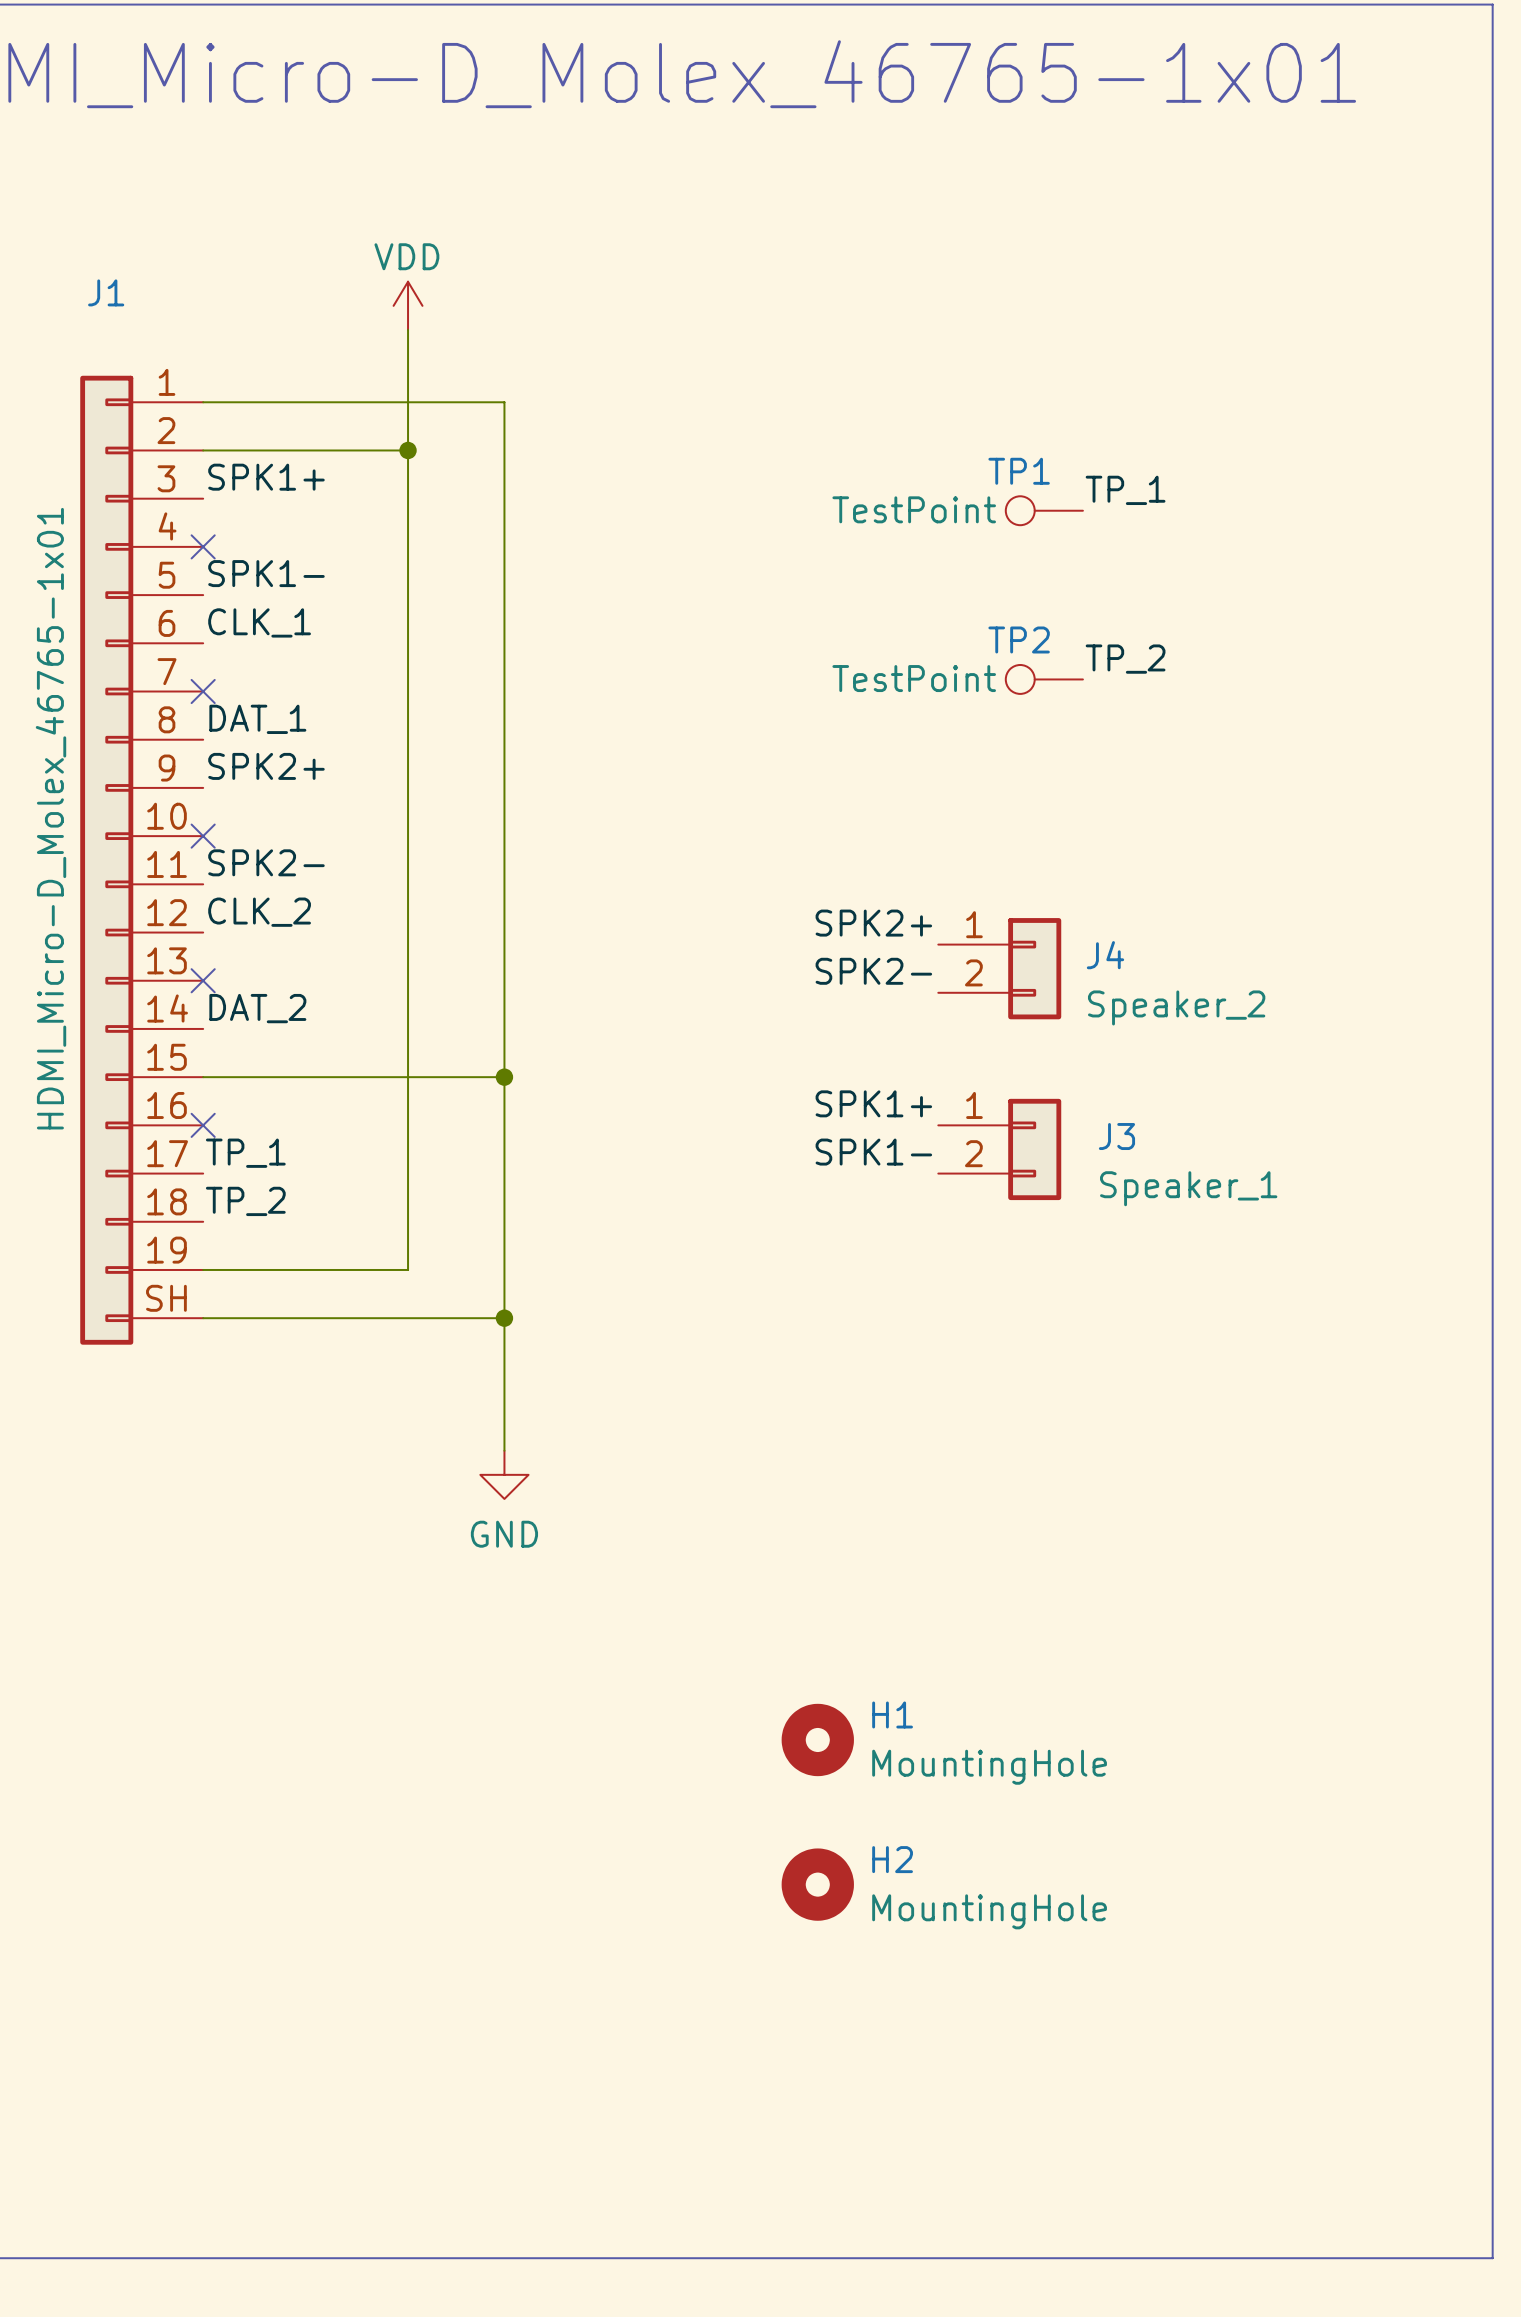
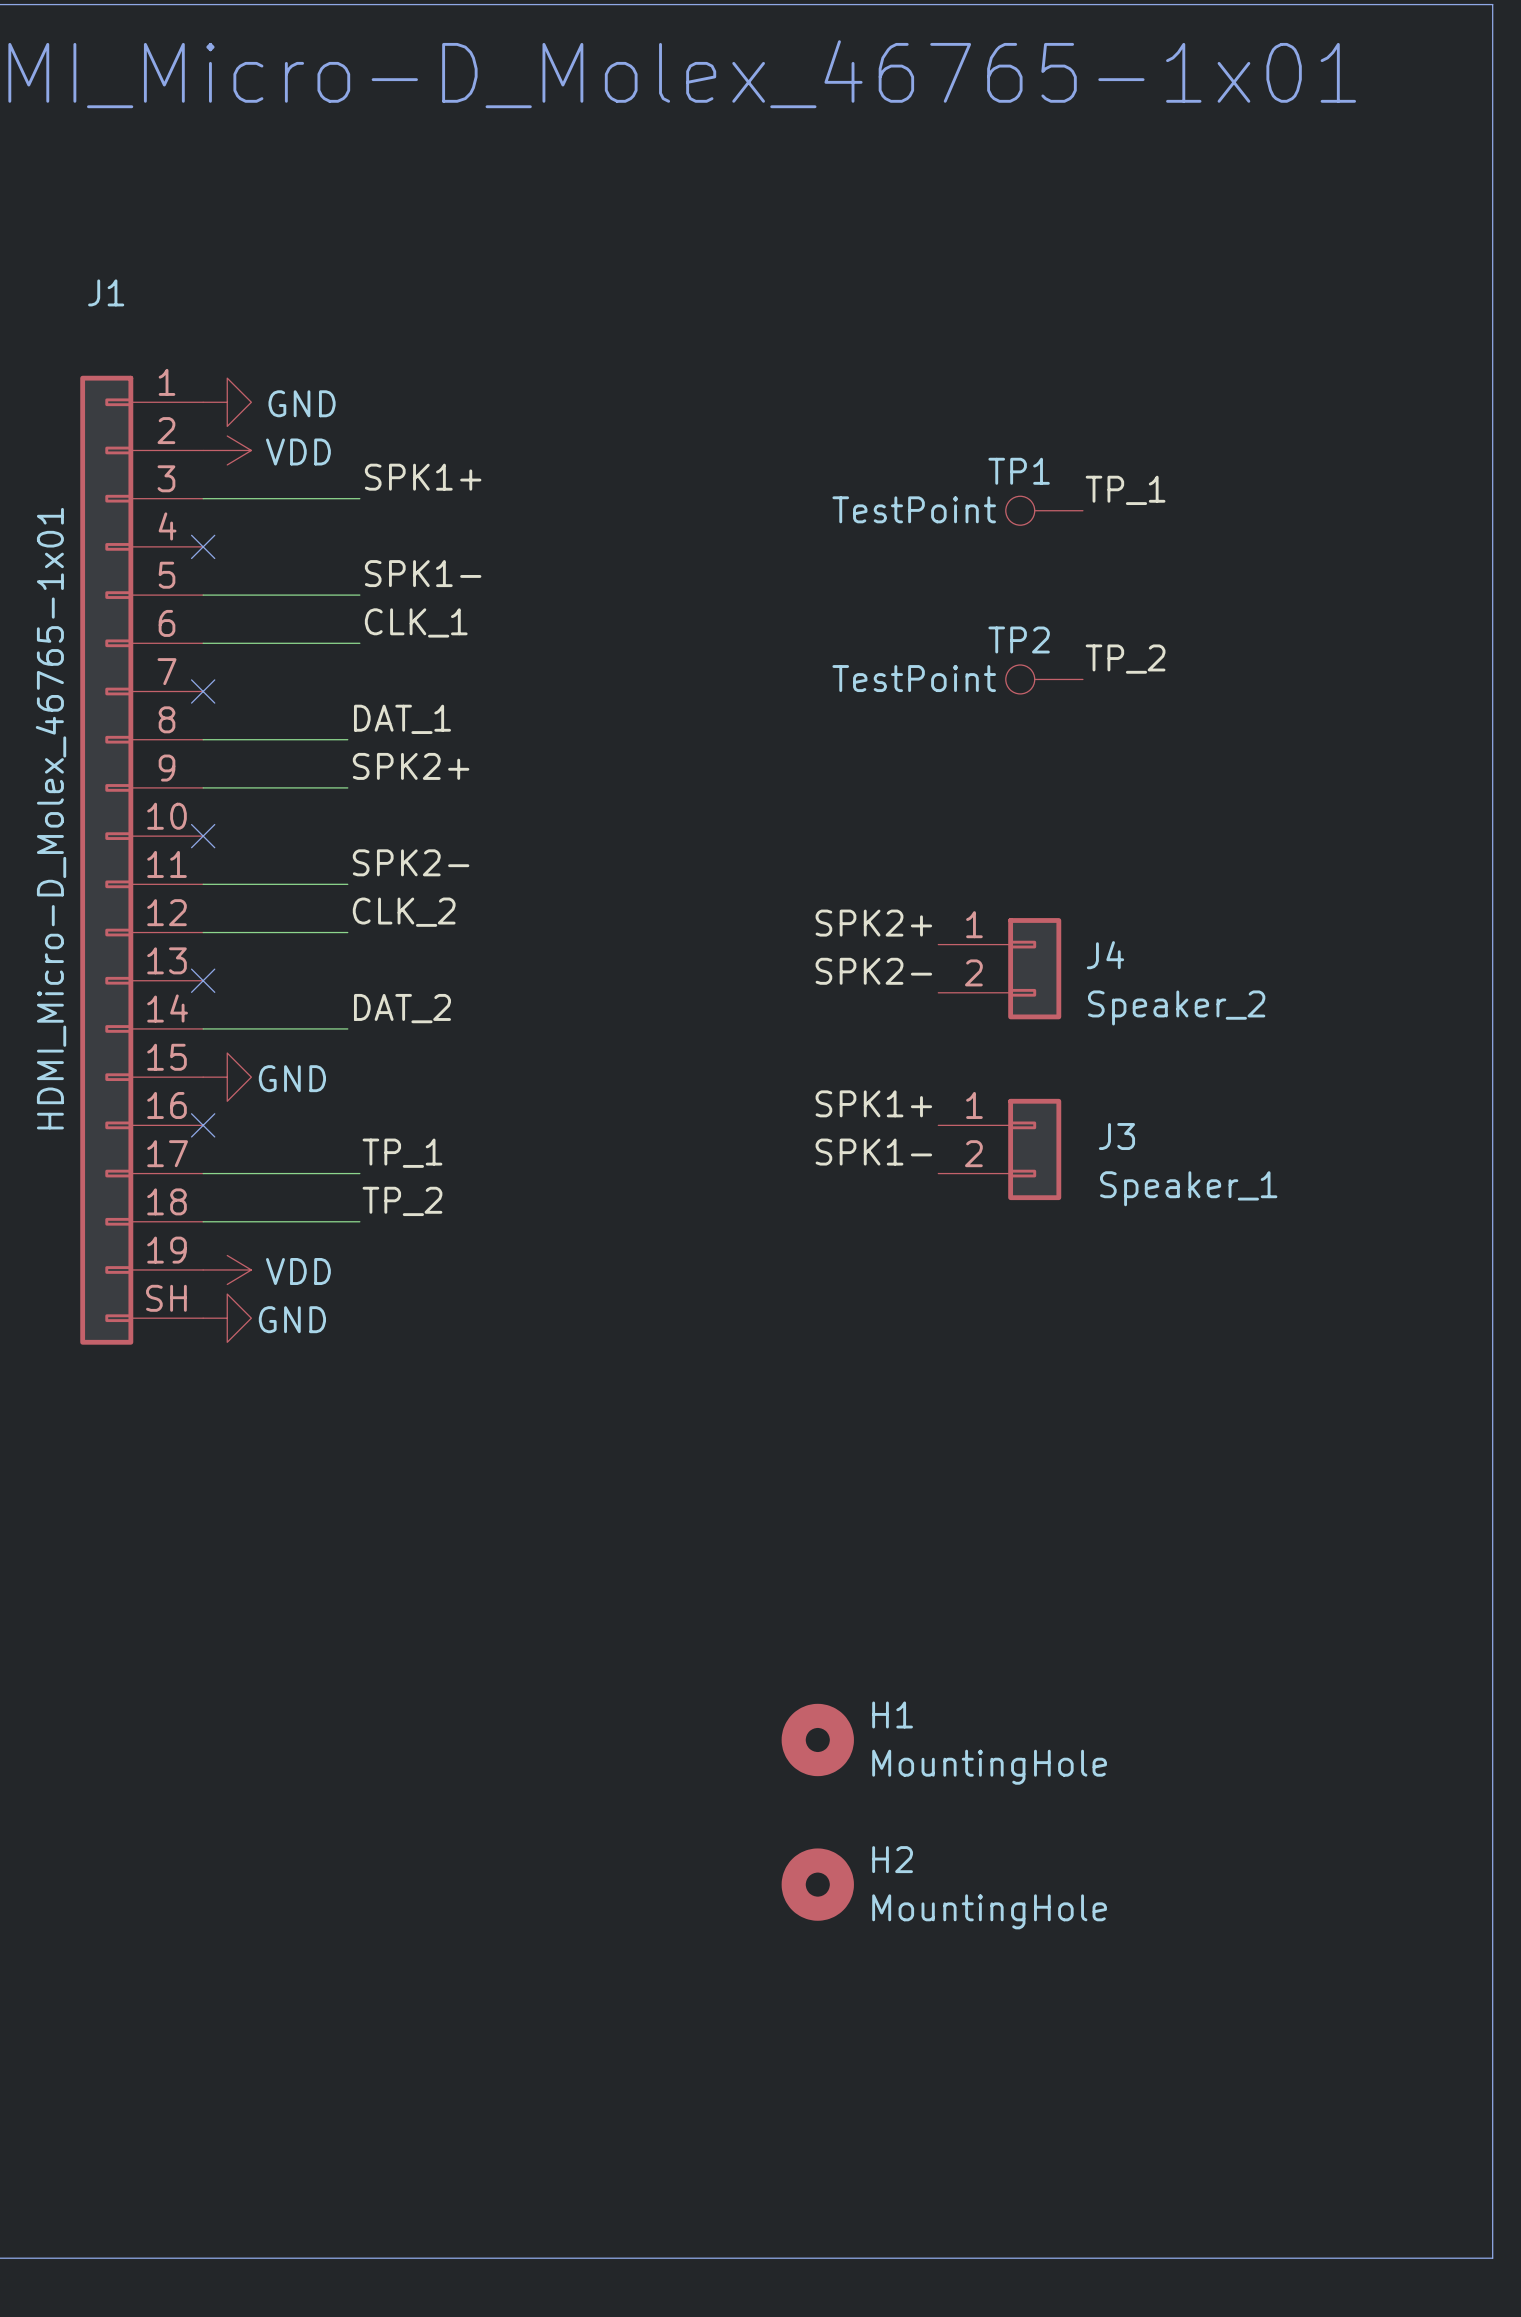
power symbol rotation: 0° (408, 305) -> 90° clockwise (227, 450)
power symbol position: VDD (408, 305) -> VDD (227, 450)
wire: (408, 329) (408, 1269) (203, 1269) -> none
wire: (203, 402) (504, 402) (504, 1450) -> none
power symbol: none -> GND (227, 402)
wire: (203, 450) (408, 450) -> none
junction: (408, 450) -> none
label position: SPK1+ (266, 477) -> SPK1+ (423, 477)
wire: none -> (203, 498) (359, 498)
label position: SPK1- (266, 573) -> SPK1- (423, 573)
wire: none -> (203, 595) (359, 595)
label position: CLK_1 (259, 622) -> CLK_1 (416, 622)
wire: none -> (203, 643) (359, 643)
label position: DAT_1 (257, 719) -> DAT_1 (402, 719)
wire: none -> (203, 739) (347, 739)
label position: SPK2+ (266, 766) -> SPK2+ (411, 766)
wire: none -> (203, 787) (347, 787)
label position: SPK2- (266, 862) -> SPK2- (411, 862)
wire: none -> (203, 884) (347, 884)
label position: CLK_2 (259, 912) -> CLK_2 (404, 912)
wire: none -> (203, 932) (347, 932)
label position: DAT_2 (257, 1008) -> DAT_2 (402, 1008)
wire: none -> (203, 1028) (347, 1028)
wire: (203, 1077) (504, 1077) -> none
power symbol: none -> GND (227, 1077)
junction: (504, 1077) -> none
label position: TP_1 (245, 1153) -> TP_1 (402, 1153)
wire: none -> (203, 1173) (359, 1173)
label position: TP_2 (245, 1201) -> TP_2 (402, 1201)
wire: none -> (203, 1221) (359, 1221)
power symbol: none -> VDD (227, 1269)
wire: (203, 1318) (504, 1318) -> none
power symbol: none -> GND (227, 1318)
junction: (504, 1318) -> none
power symbol: GND (504, 1474) -> none

